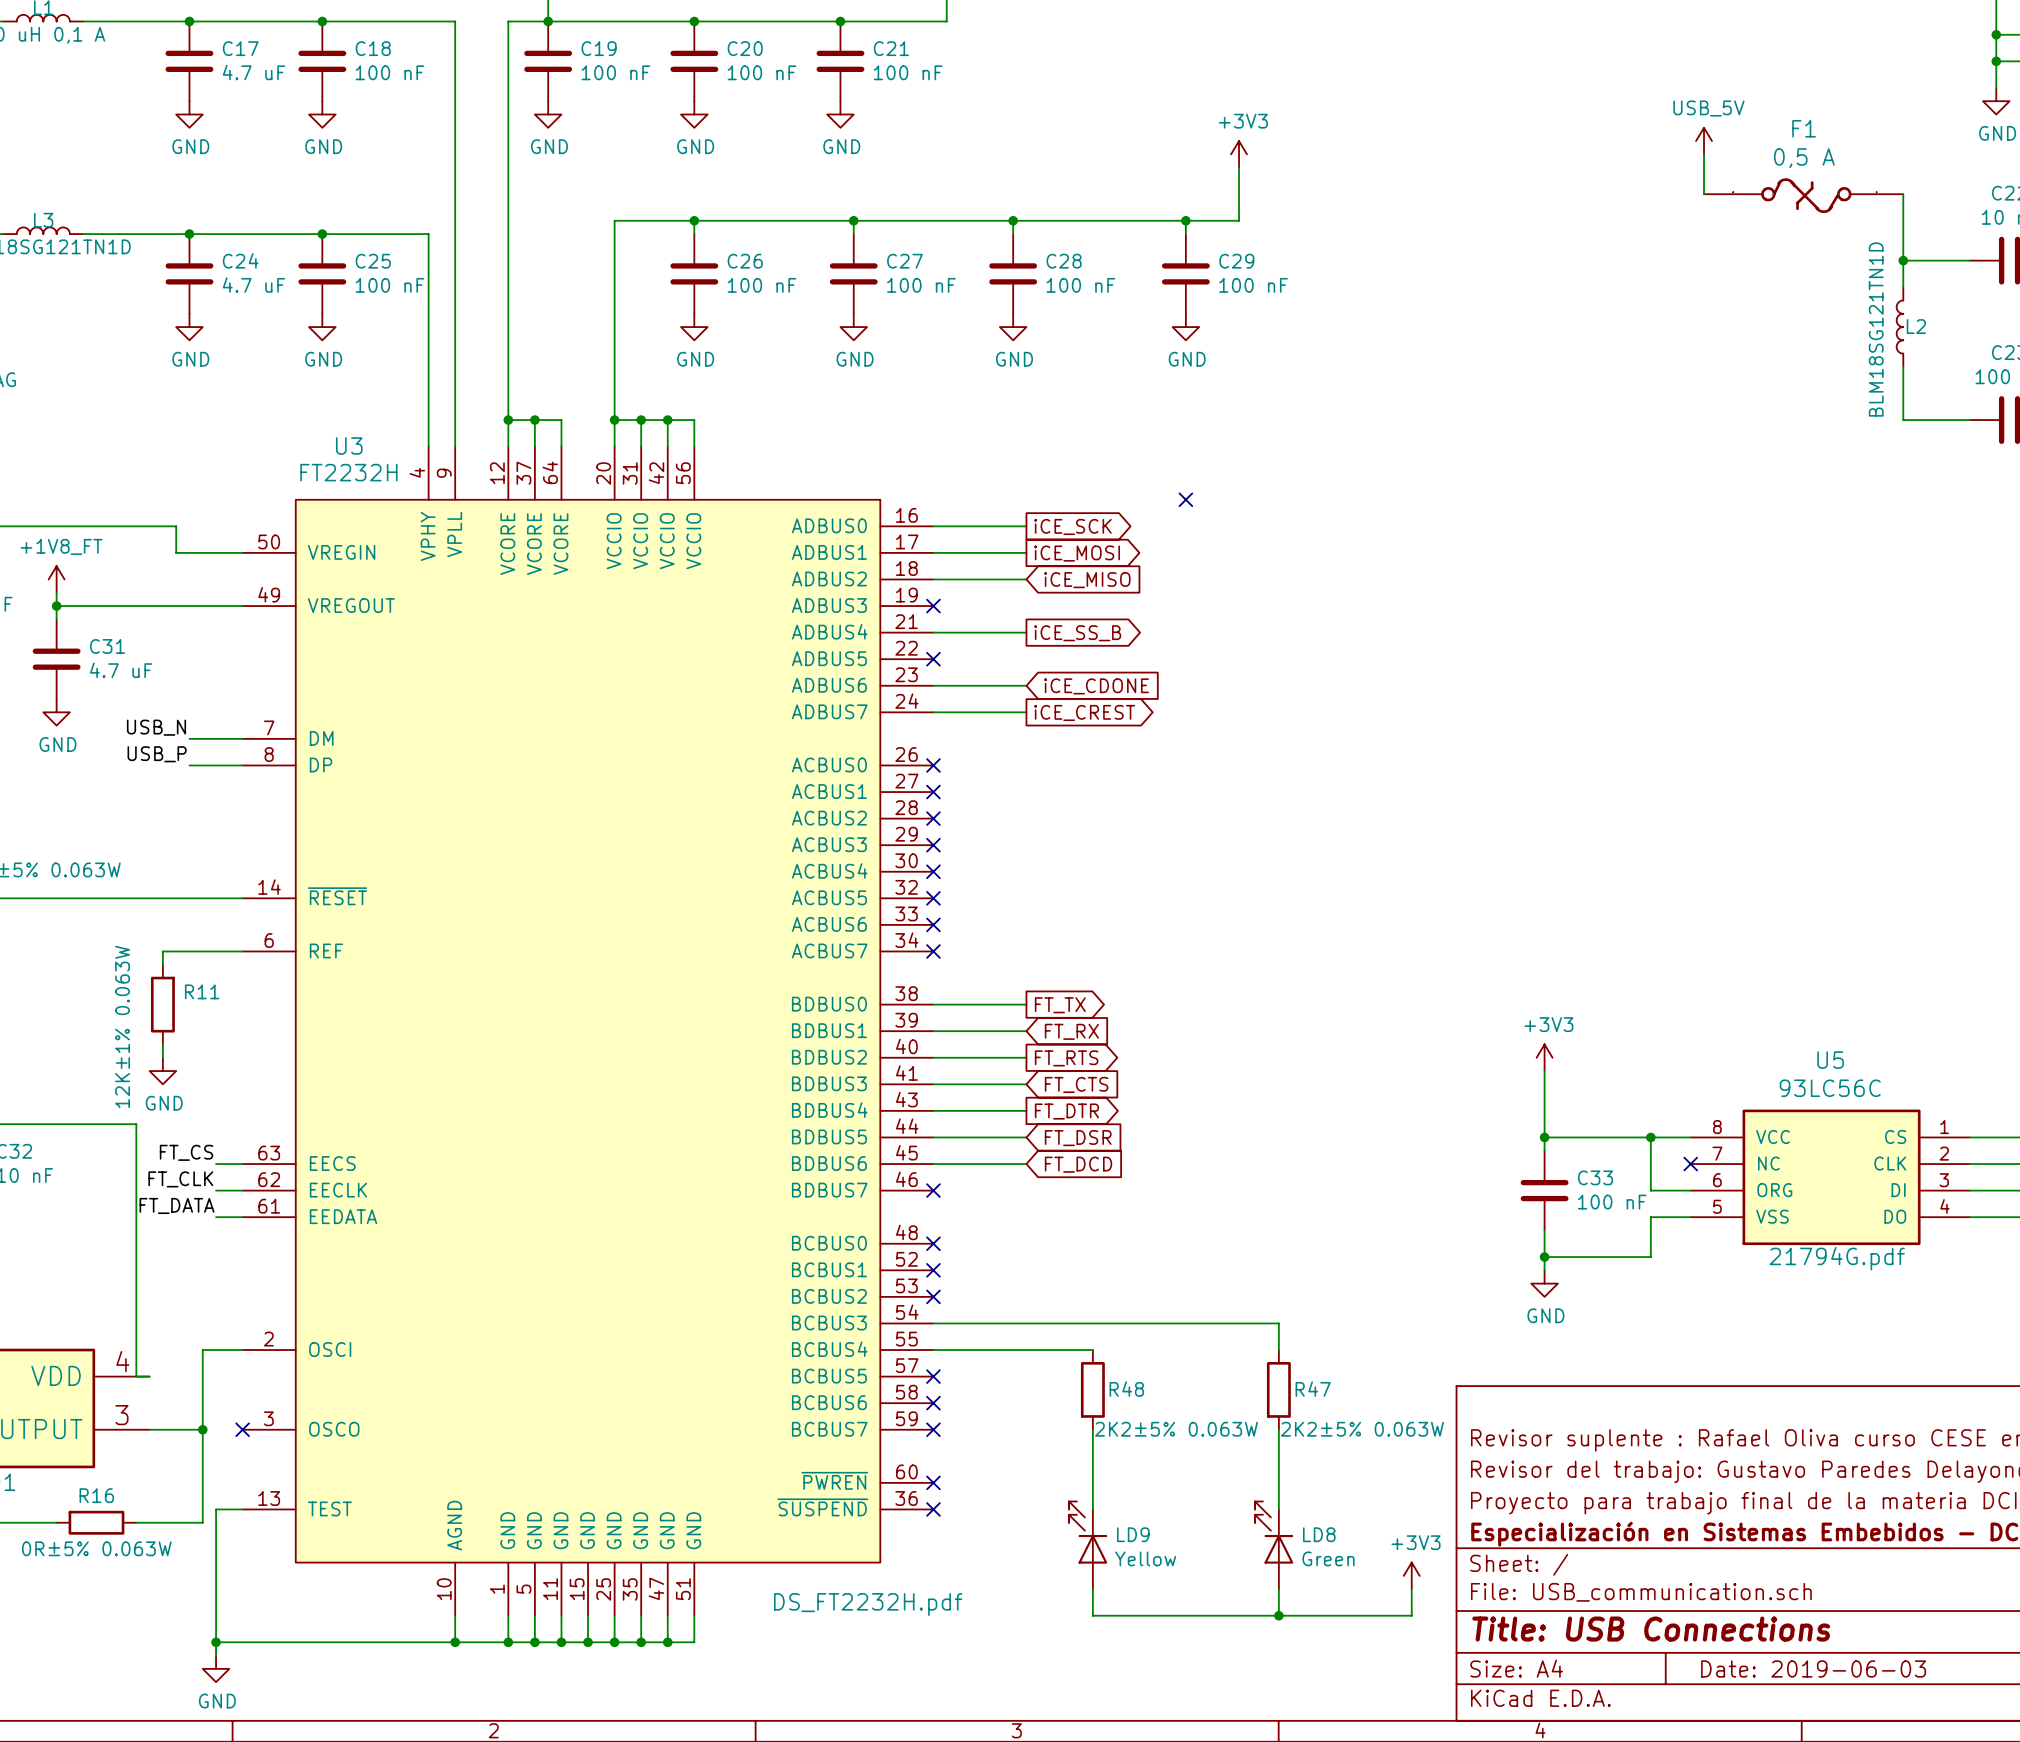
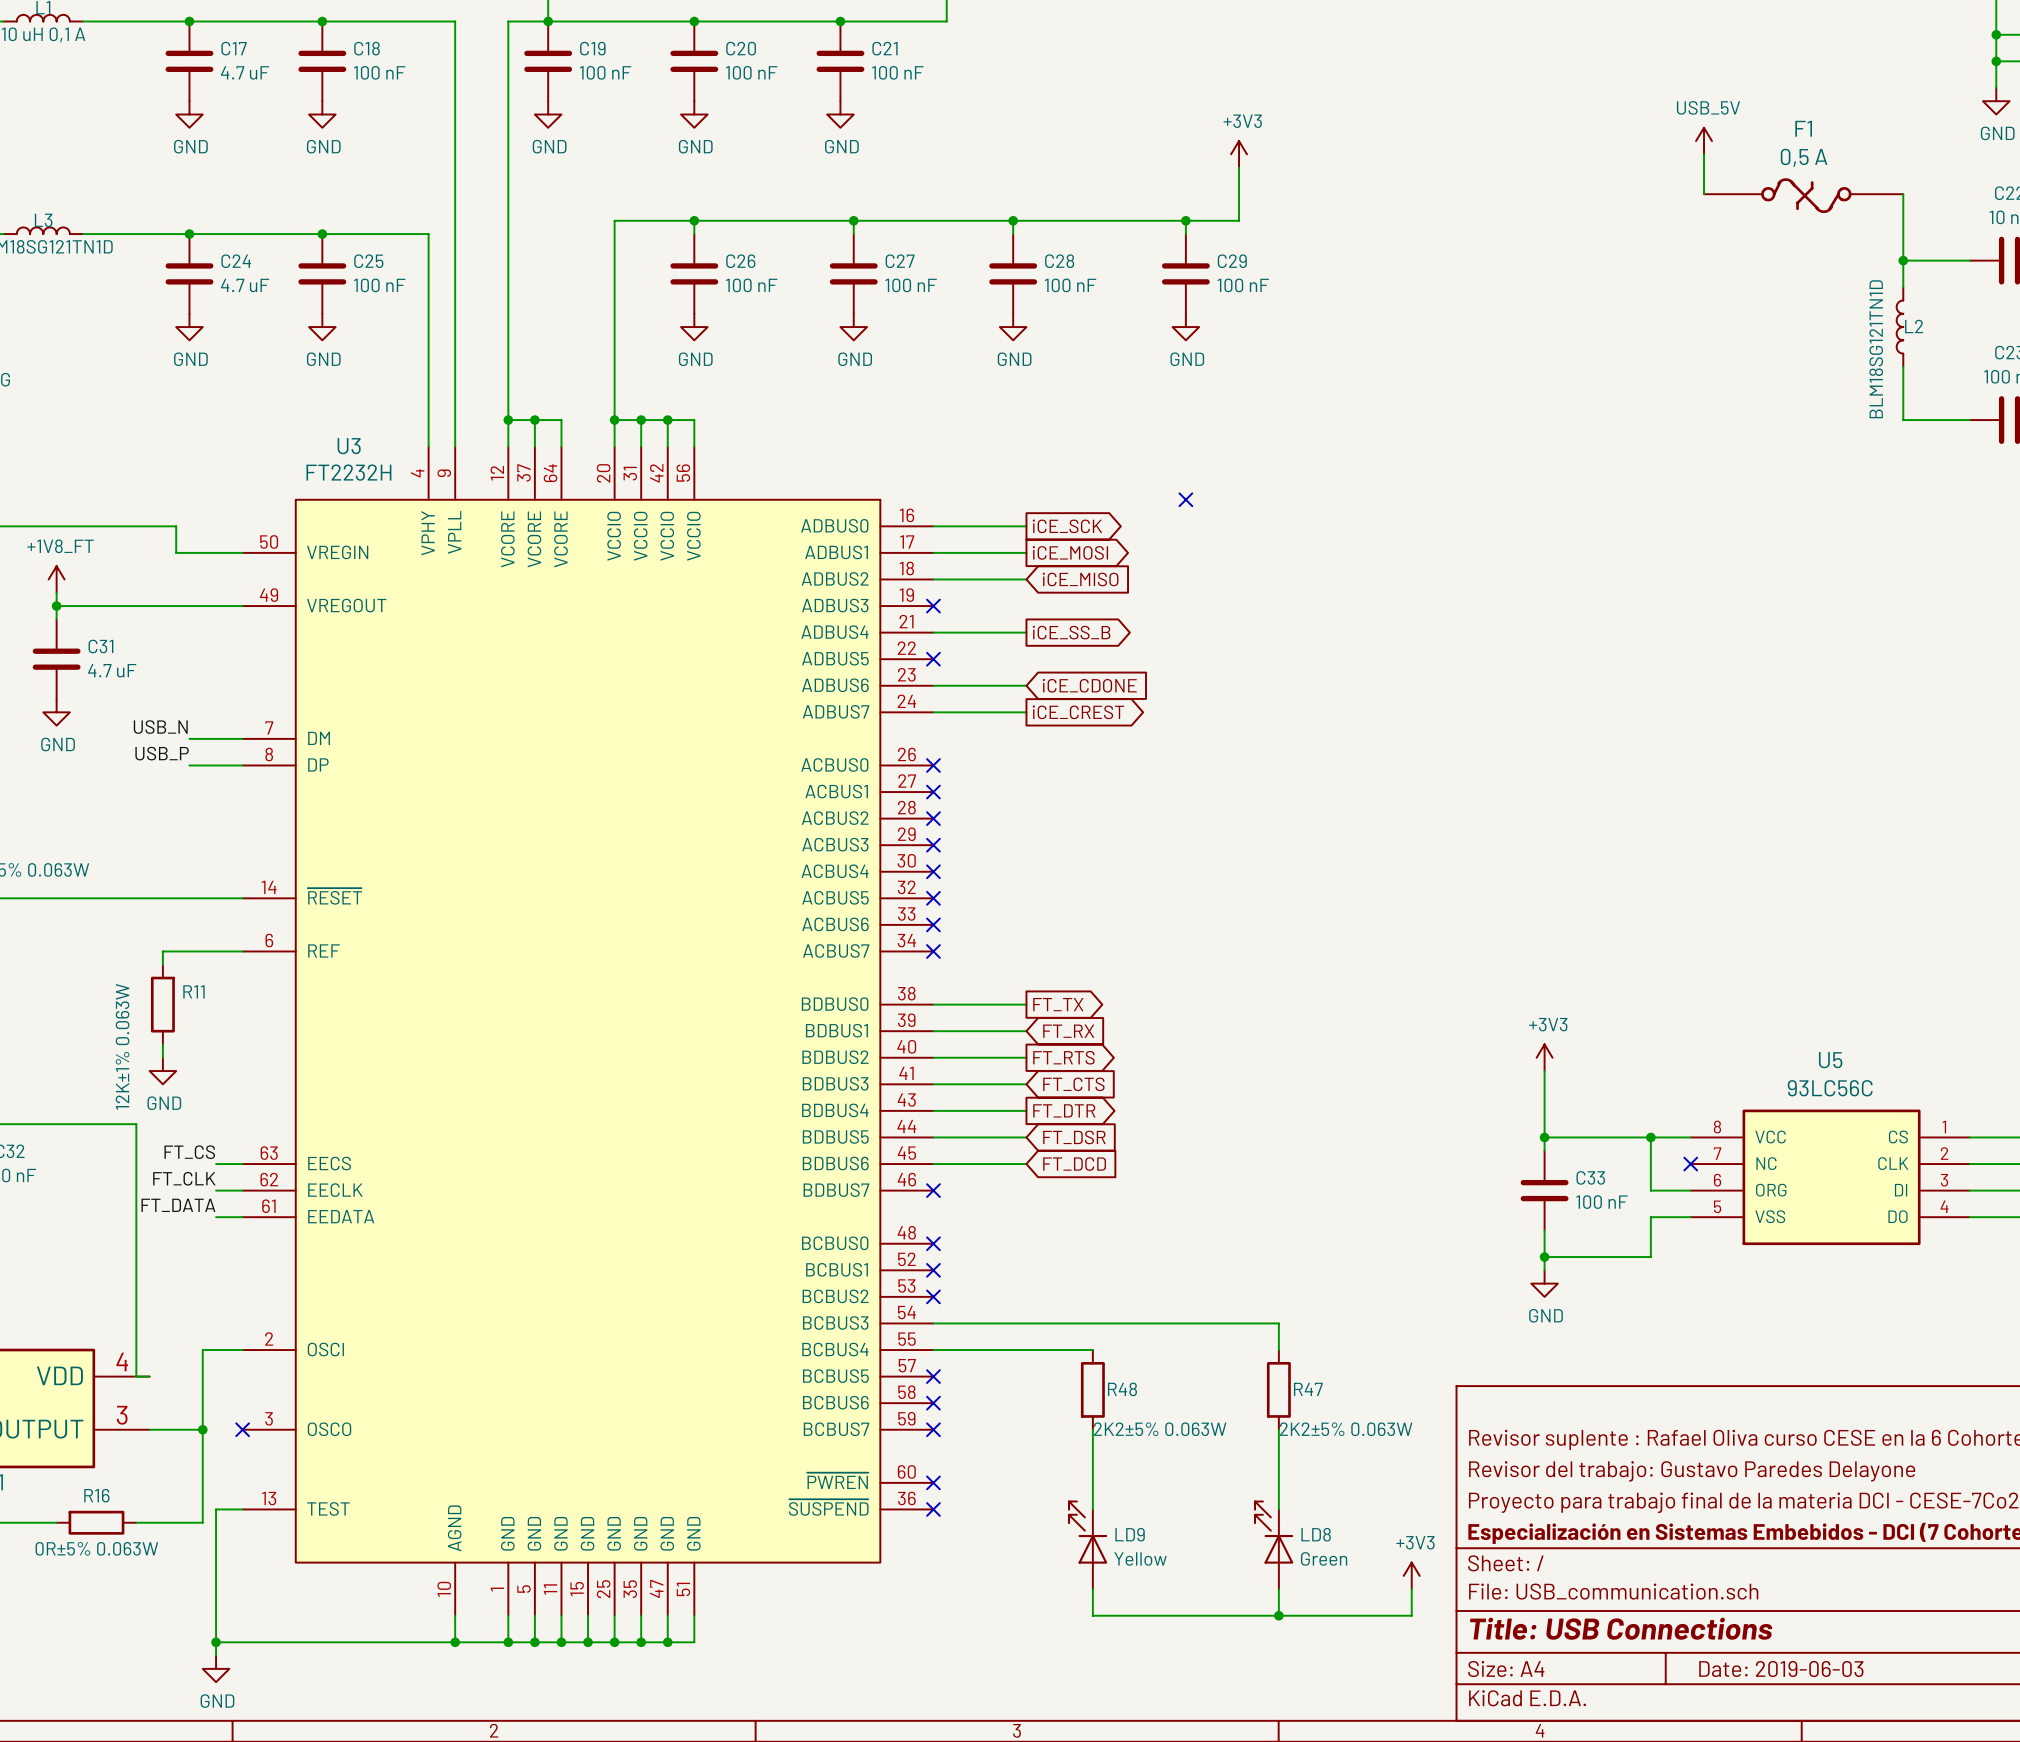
U5 text: 21794G.pdf (1837, 1258) -> none
U3 text: DS_FT2232H.pdf (868, 1604) -> none

